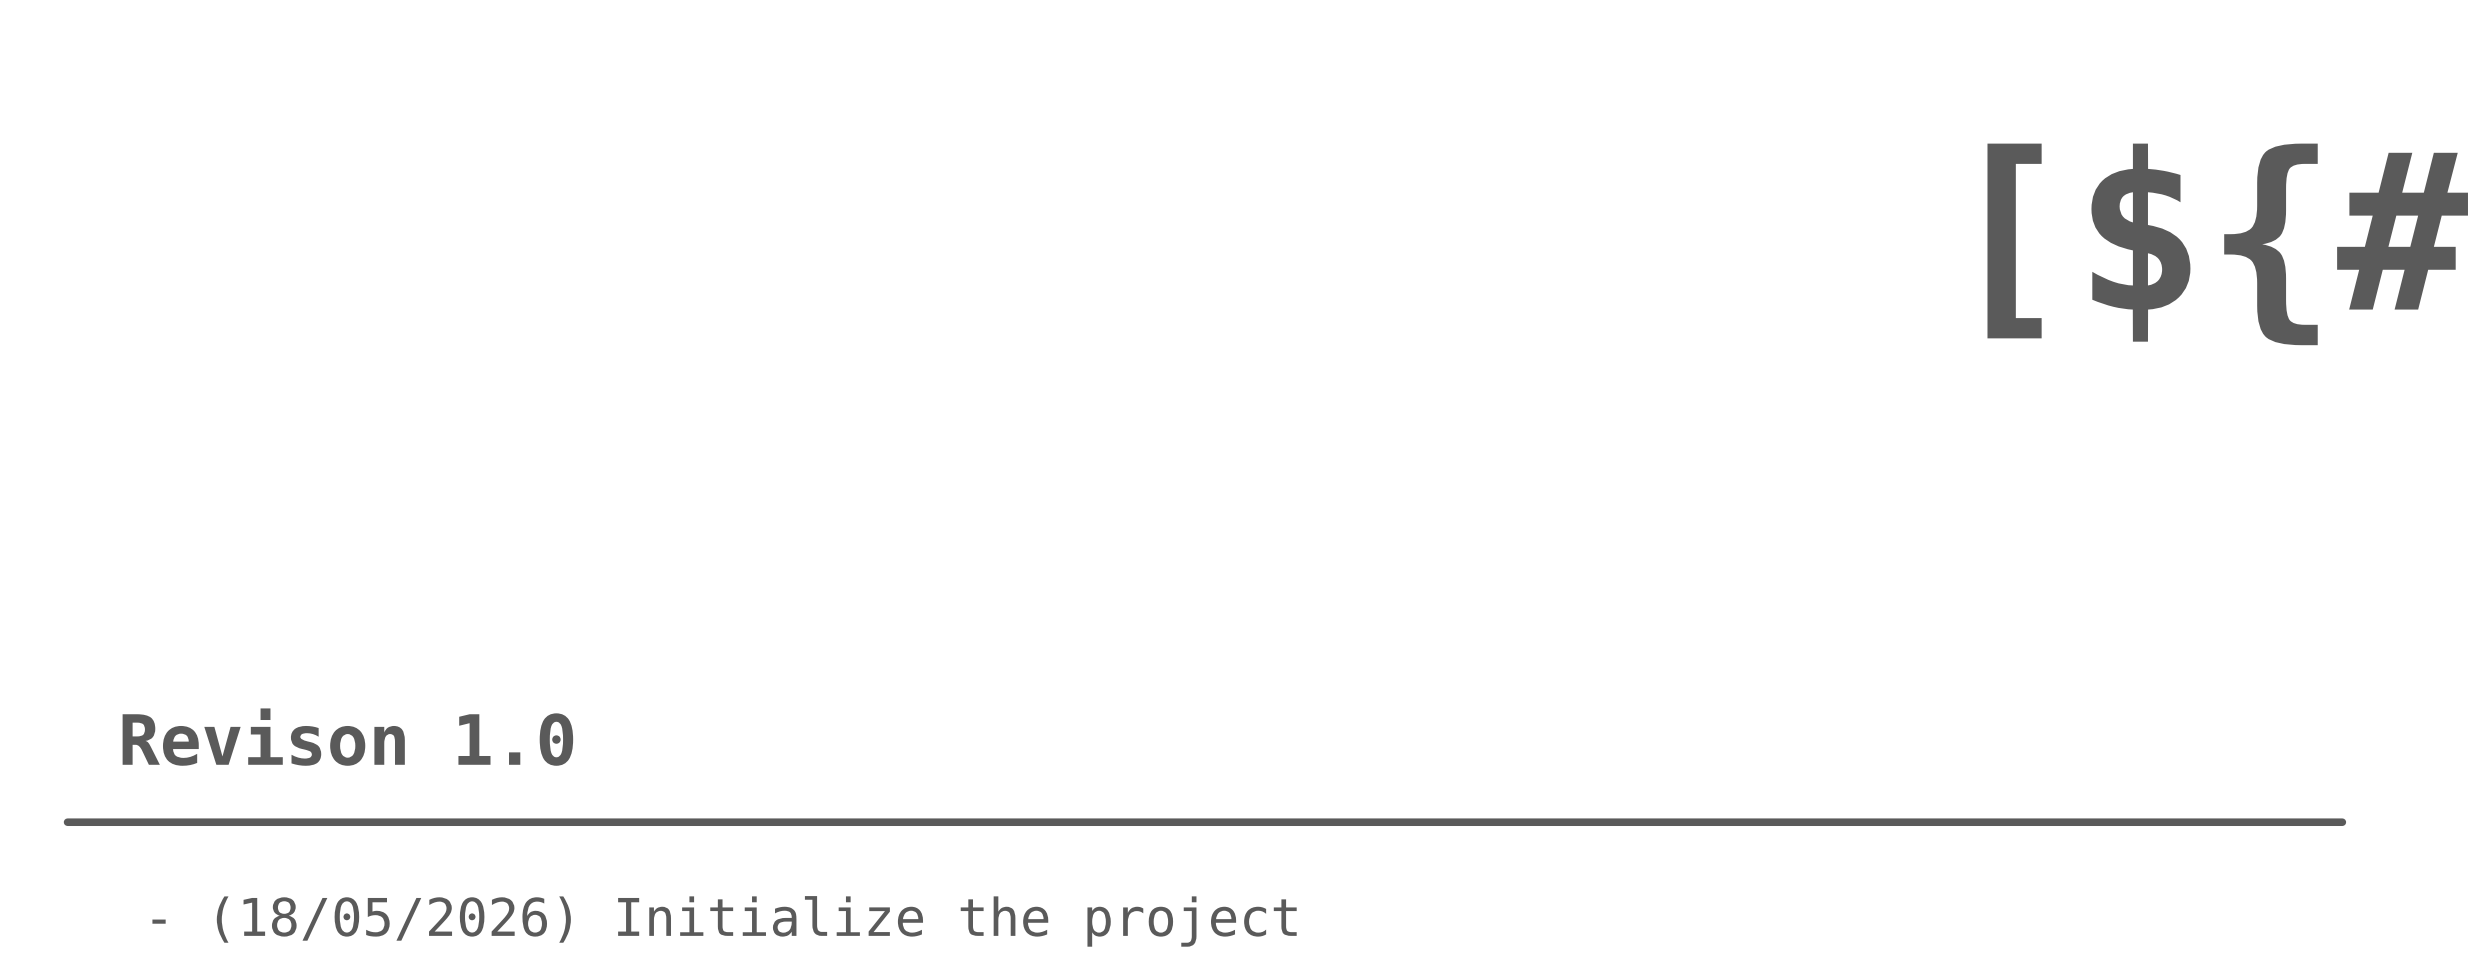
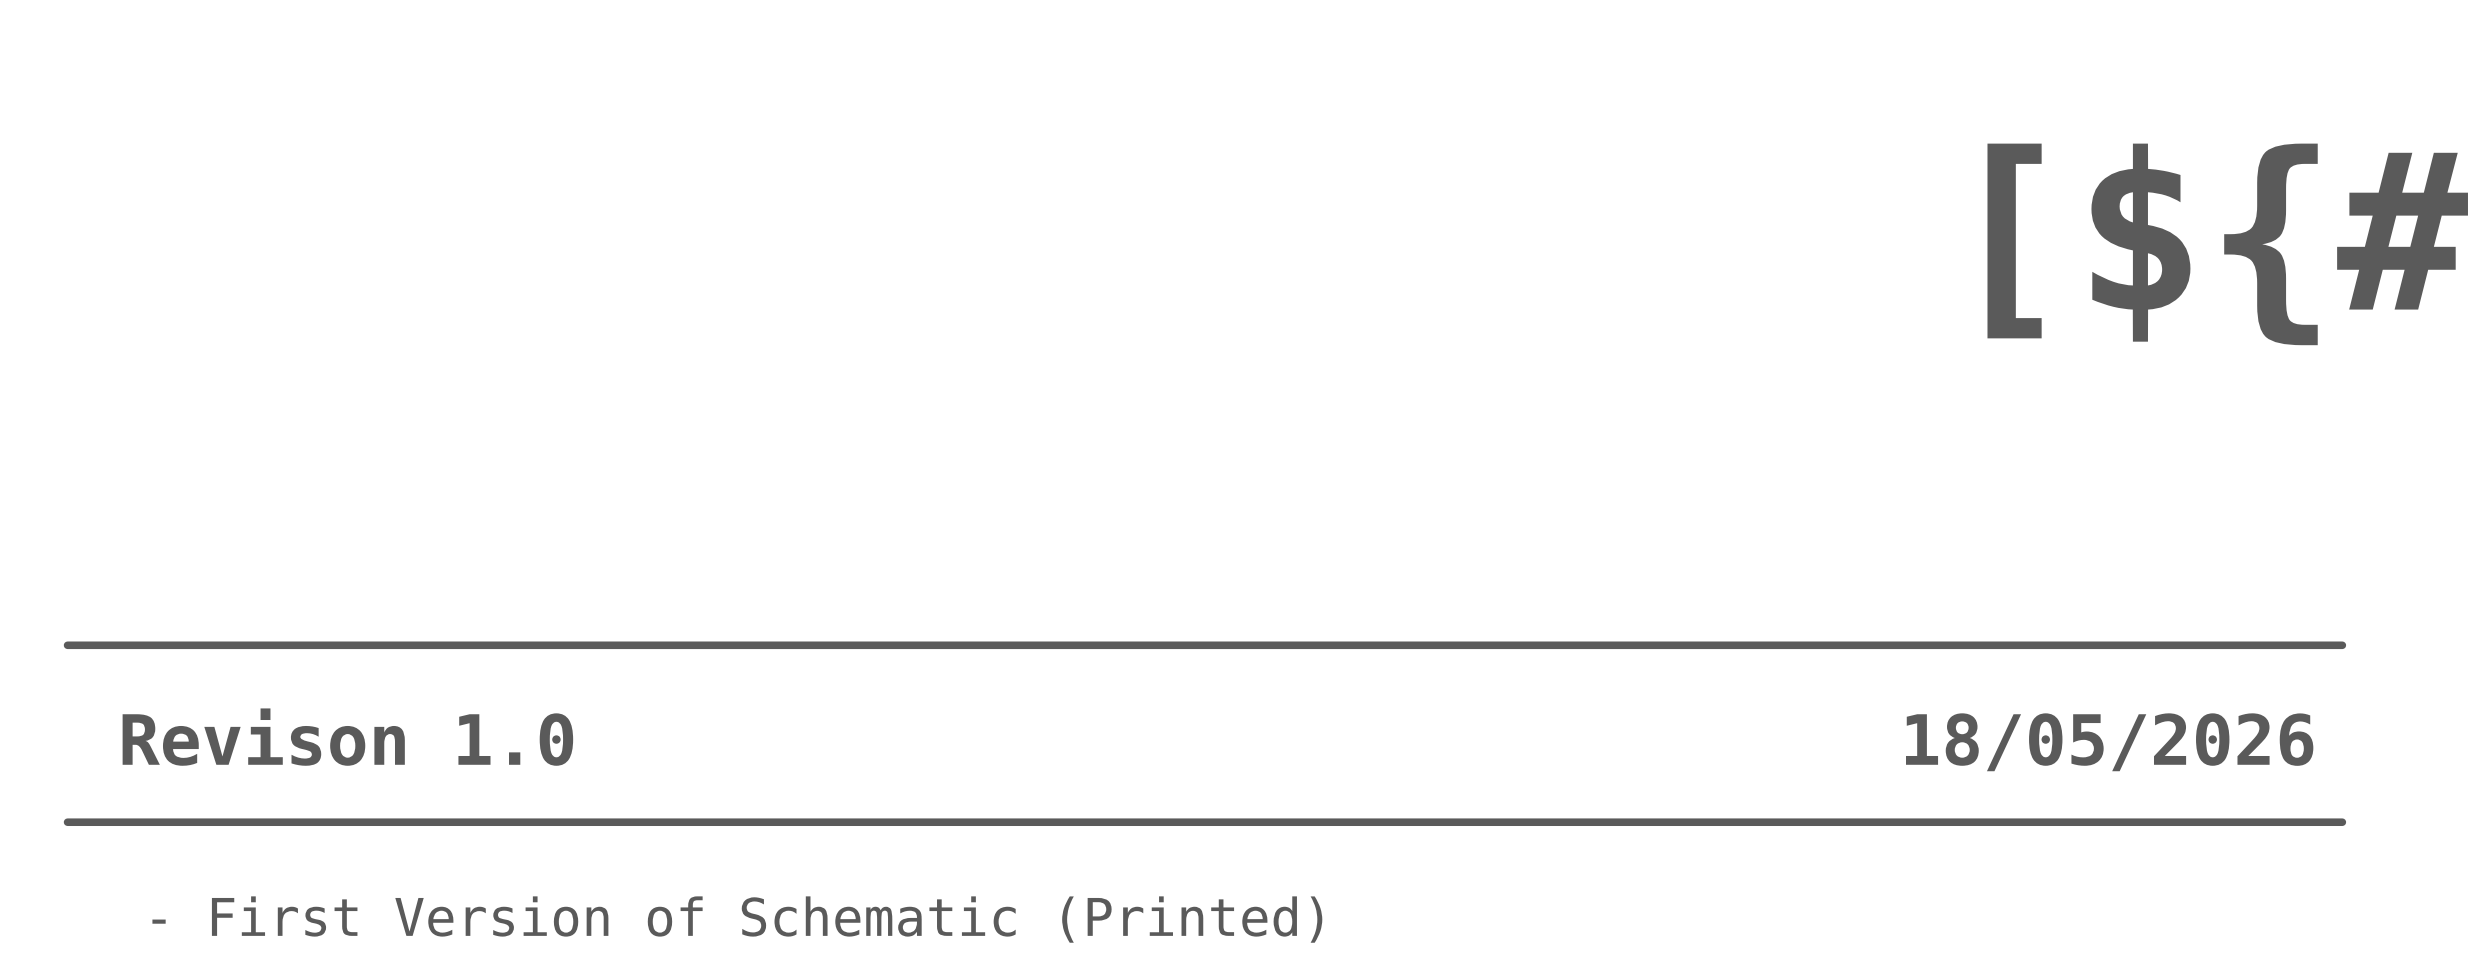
line: none -> (67, 645) (2342, 645)
text: none -> 18/05/2026 (2109, 742)
text: - (18/05/2026) Initialize the project (724, 921) -> - First Version of Schematic (Printed) (737, 919)

